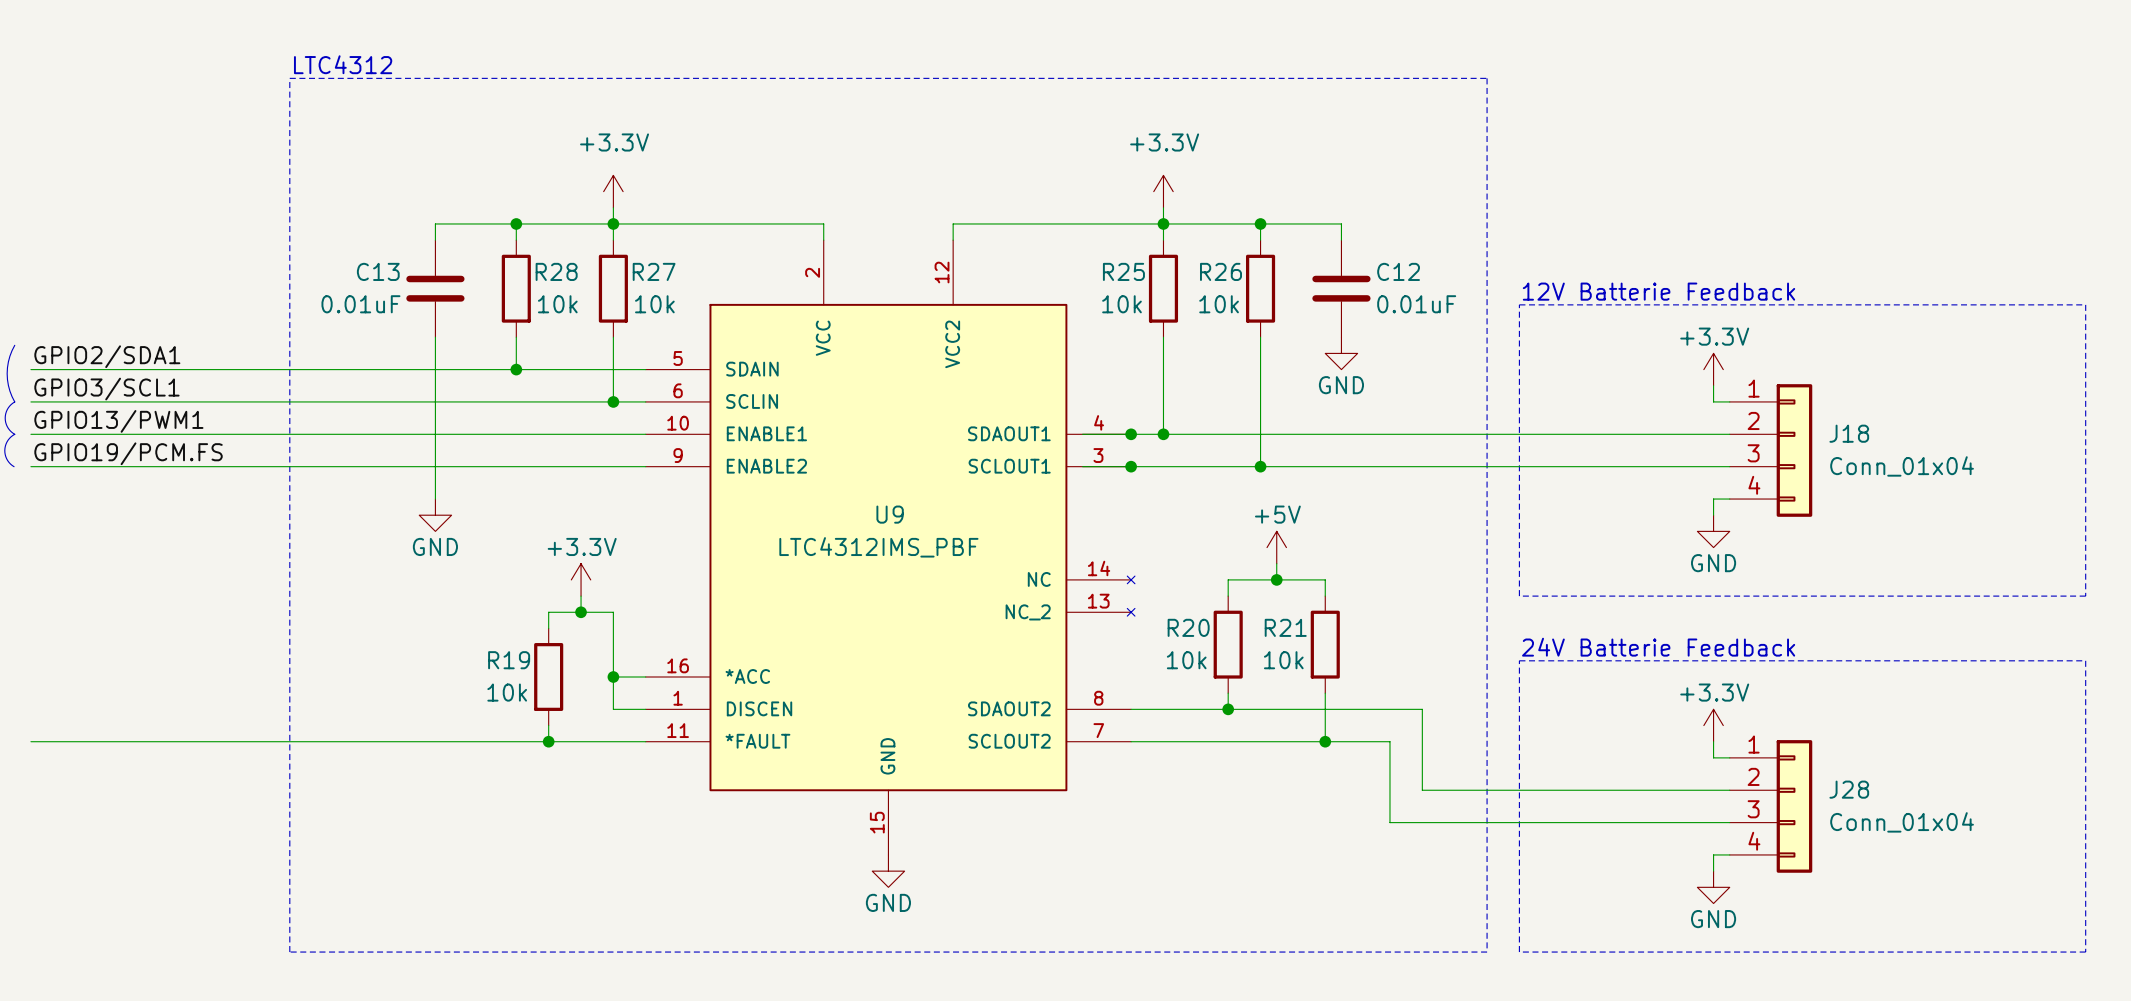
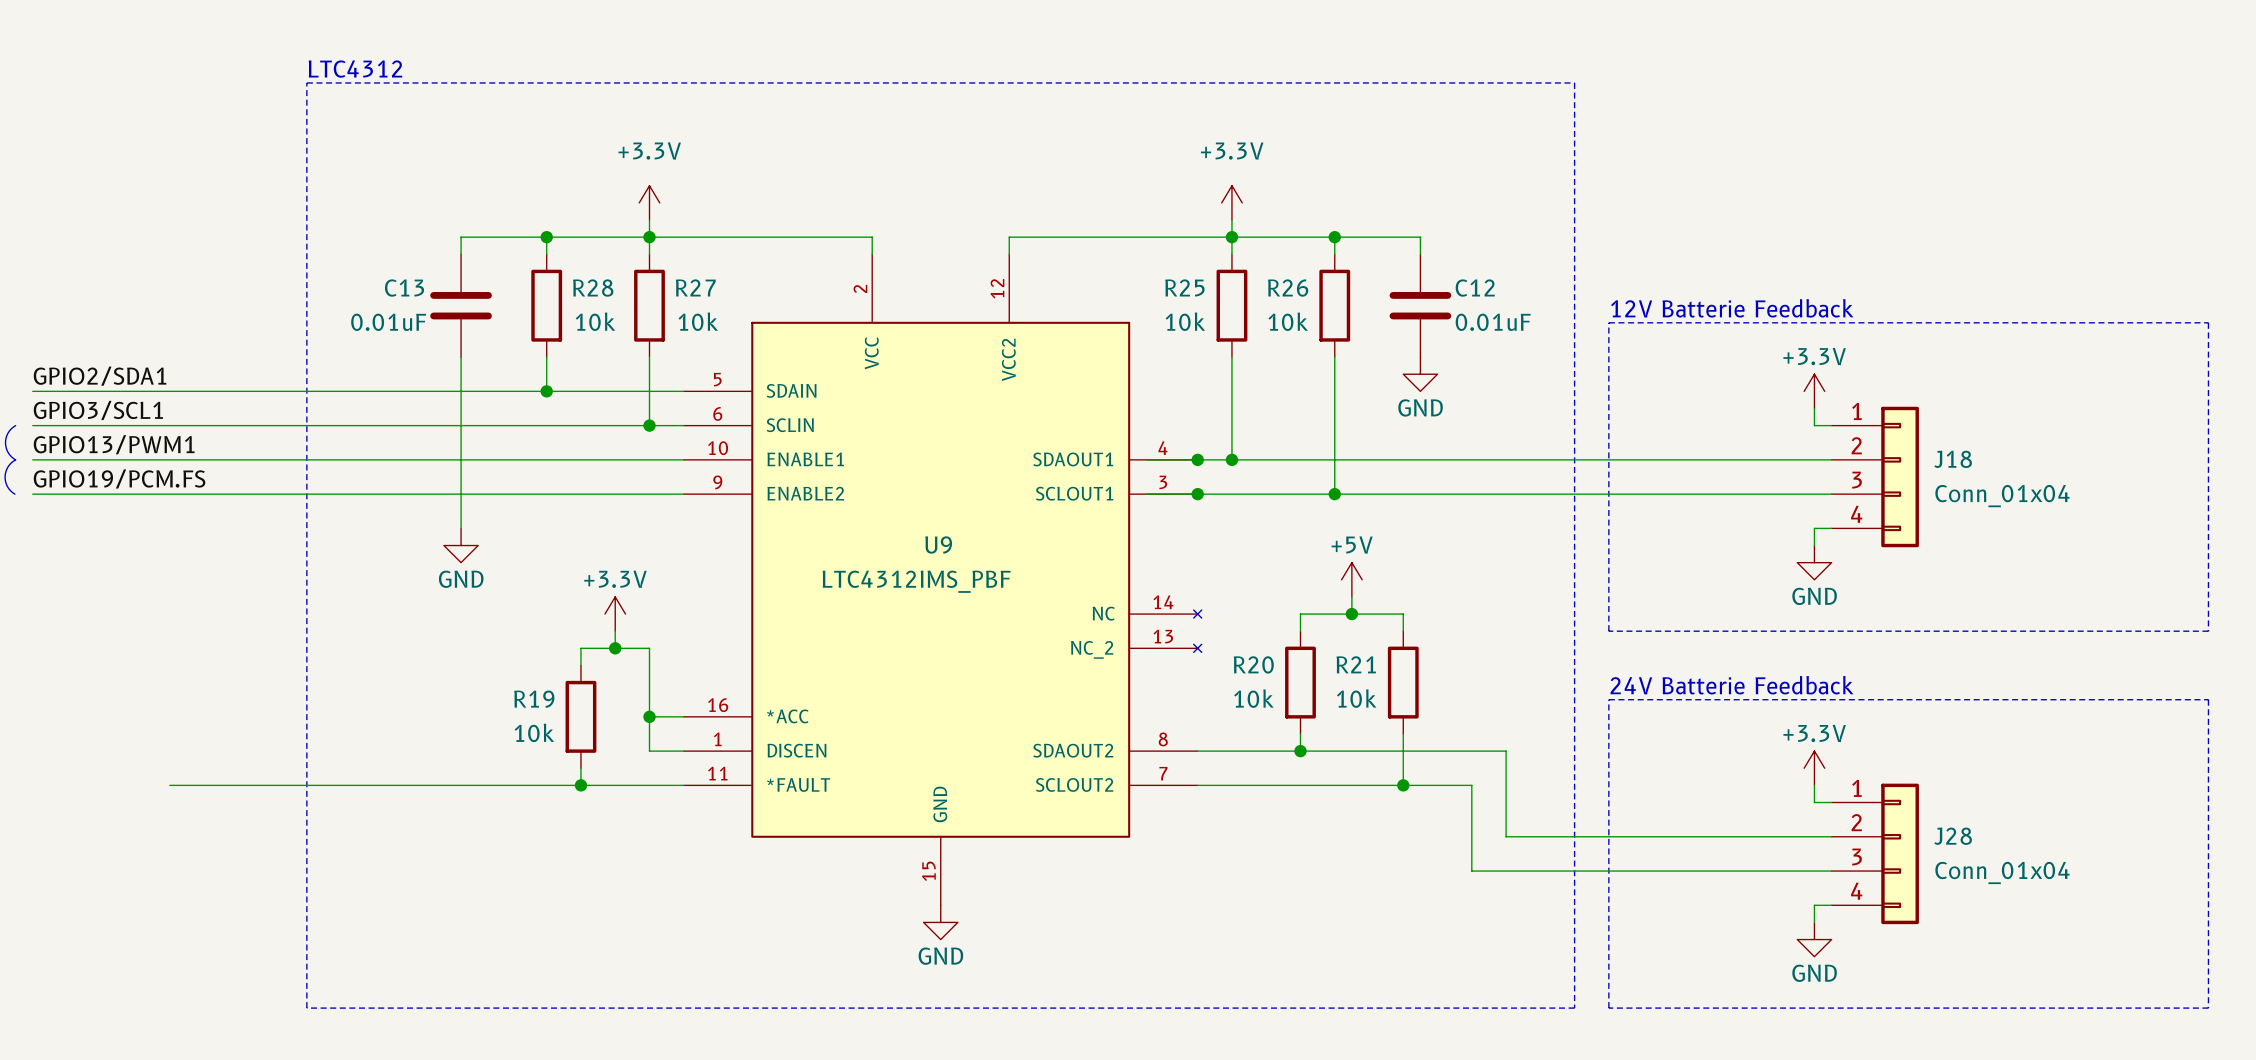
line: (14, 345) (8, 361) (7, 373) (8, 385) (14, 401) -> none
wire: (30, 741) (160, 741) -> none

